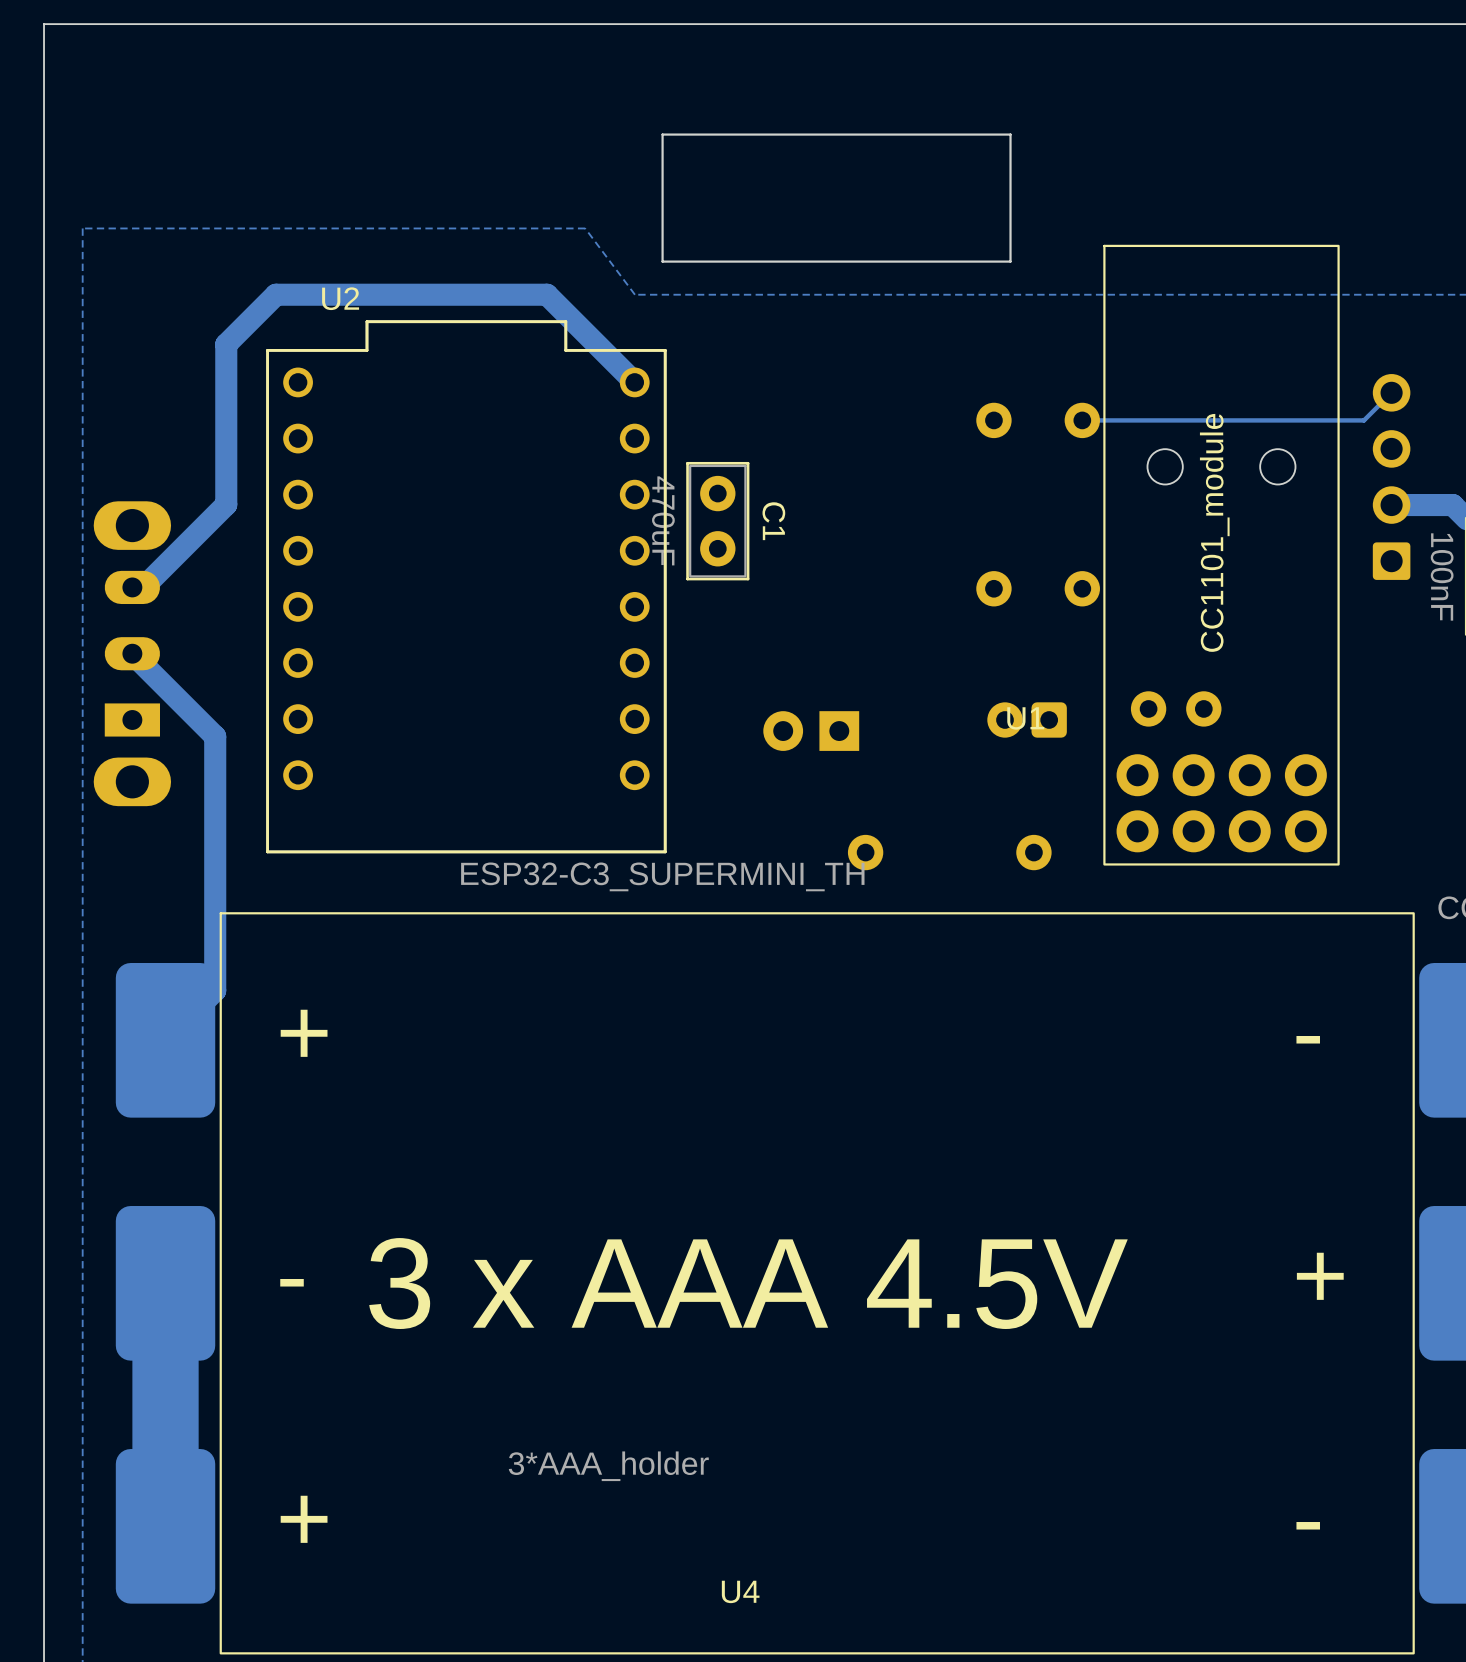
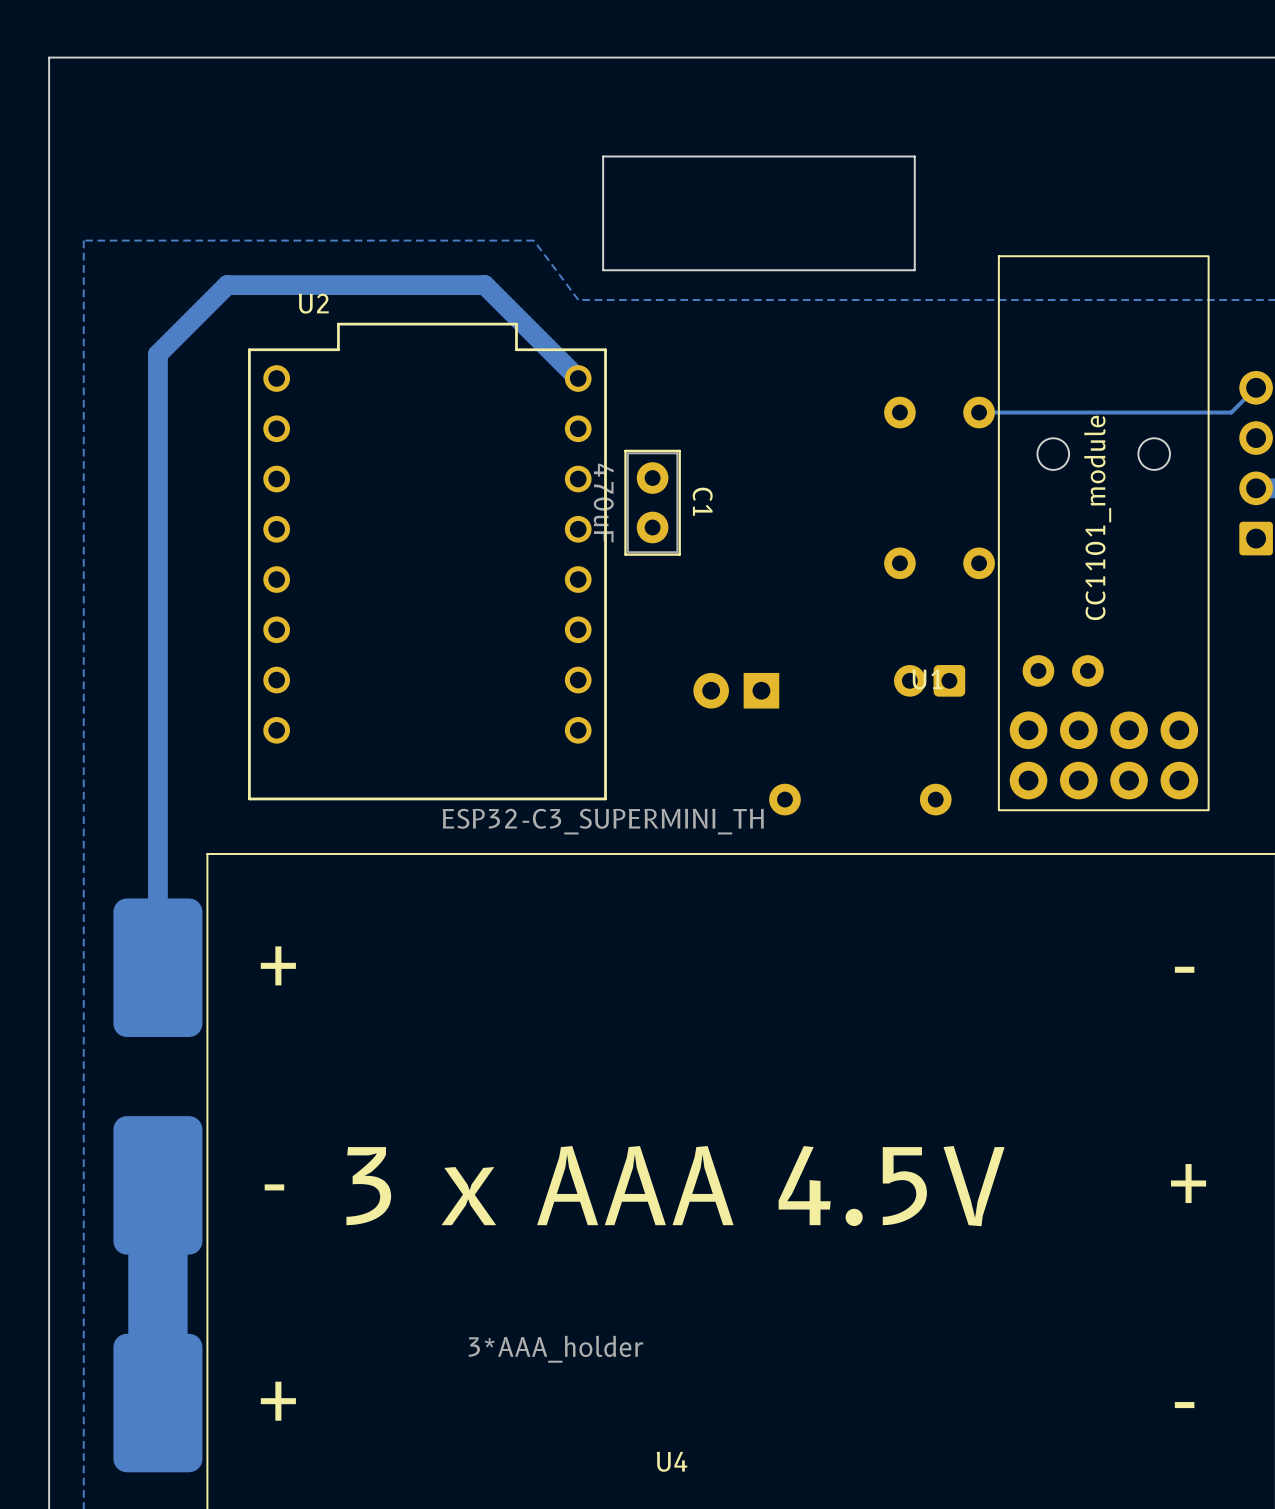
track: (547, 294) (275, 294) (226, 344) (226, 504) (143, 587) (132, 587) -> (499, 299) (484, 285) (227, 285) (157, 354) (157, 967)
track: (132, 653) (215, 736) (215, 990) (165, 1040) -> none
part: (132, 653) -> none

